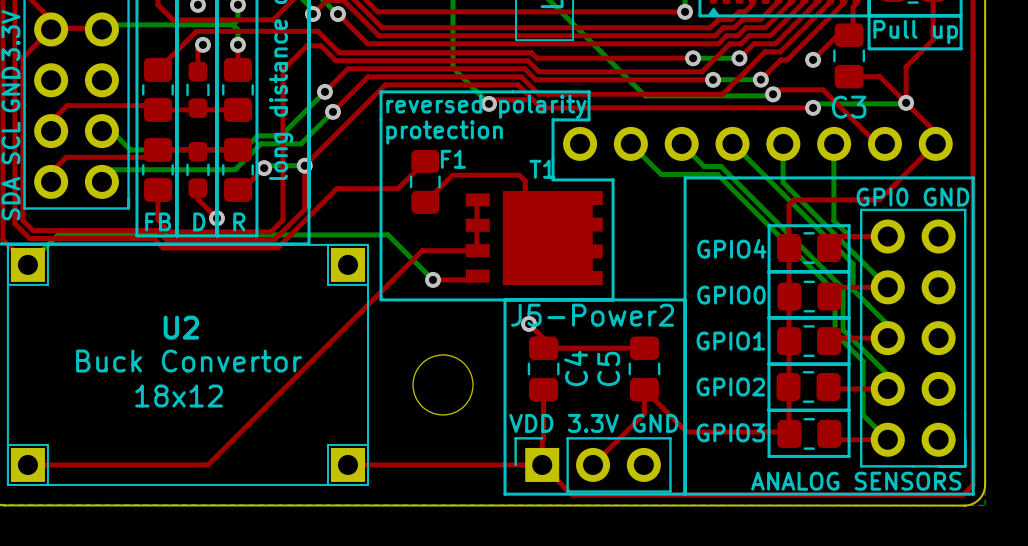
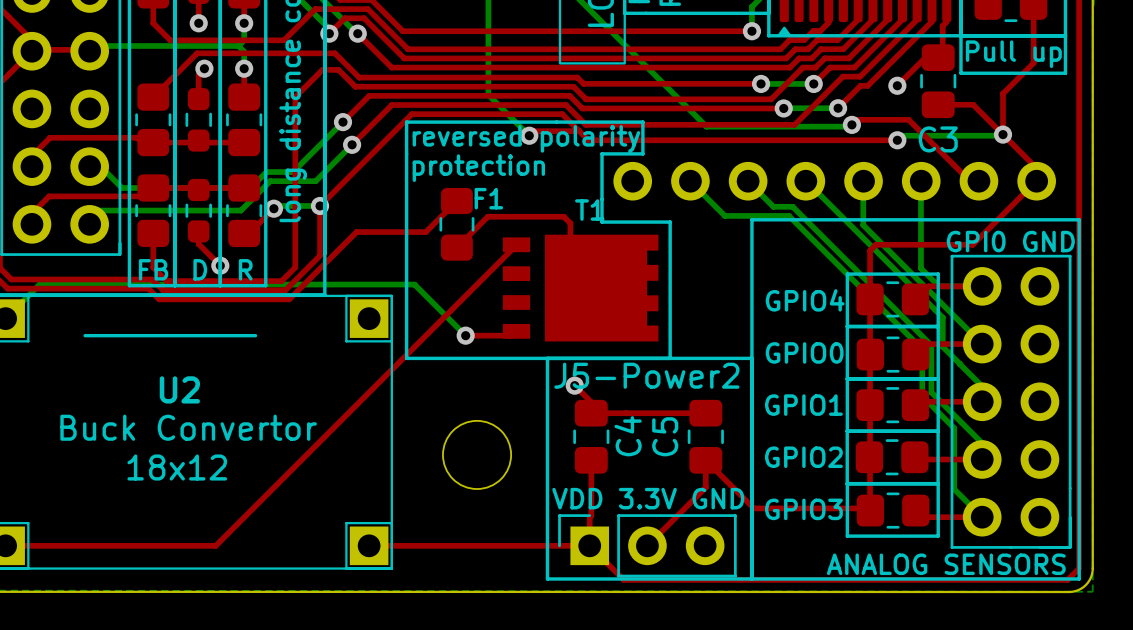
top track: (476, 201) (476, 252) -> none
top track: (483, 250) (422, 250) (207, 464) -> (516, 244) (215, 545) (210, 545)
line: none -> (85, 335) (255, 335)

